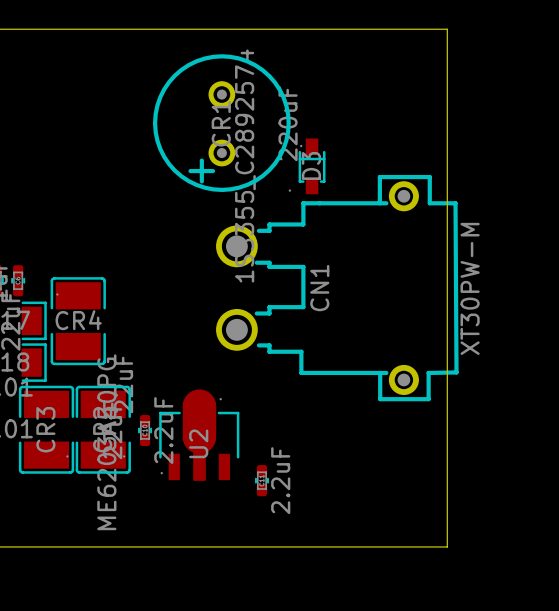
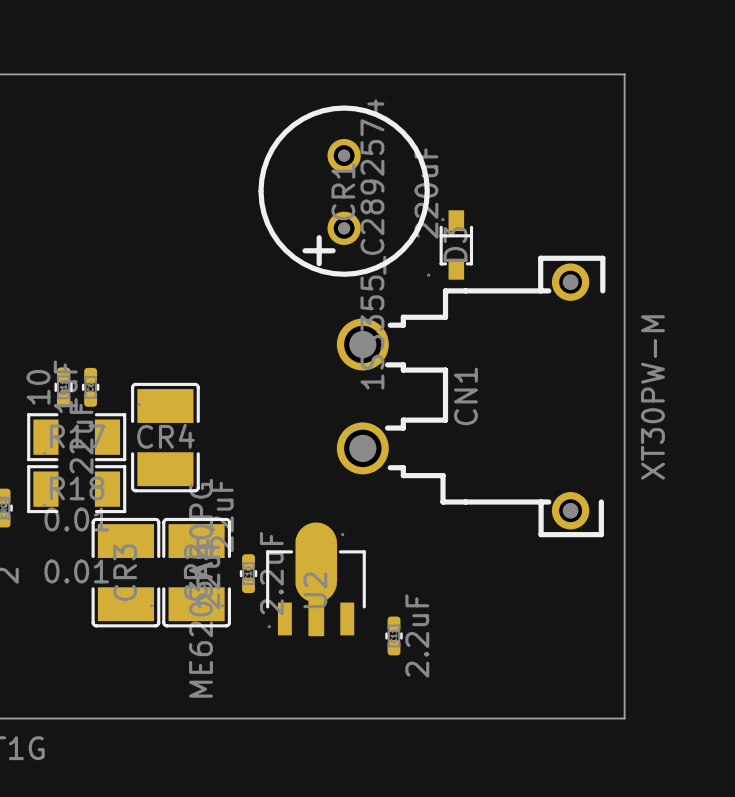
CN1 footprint: [216, 174, 459, 402] -> [336, 255, 606, 538]

